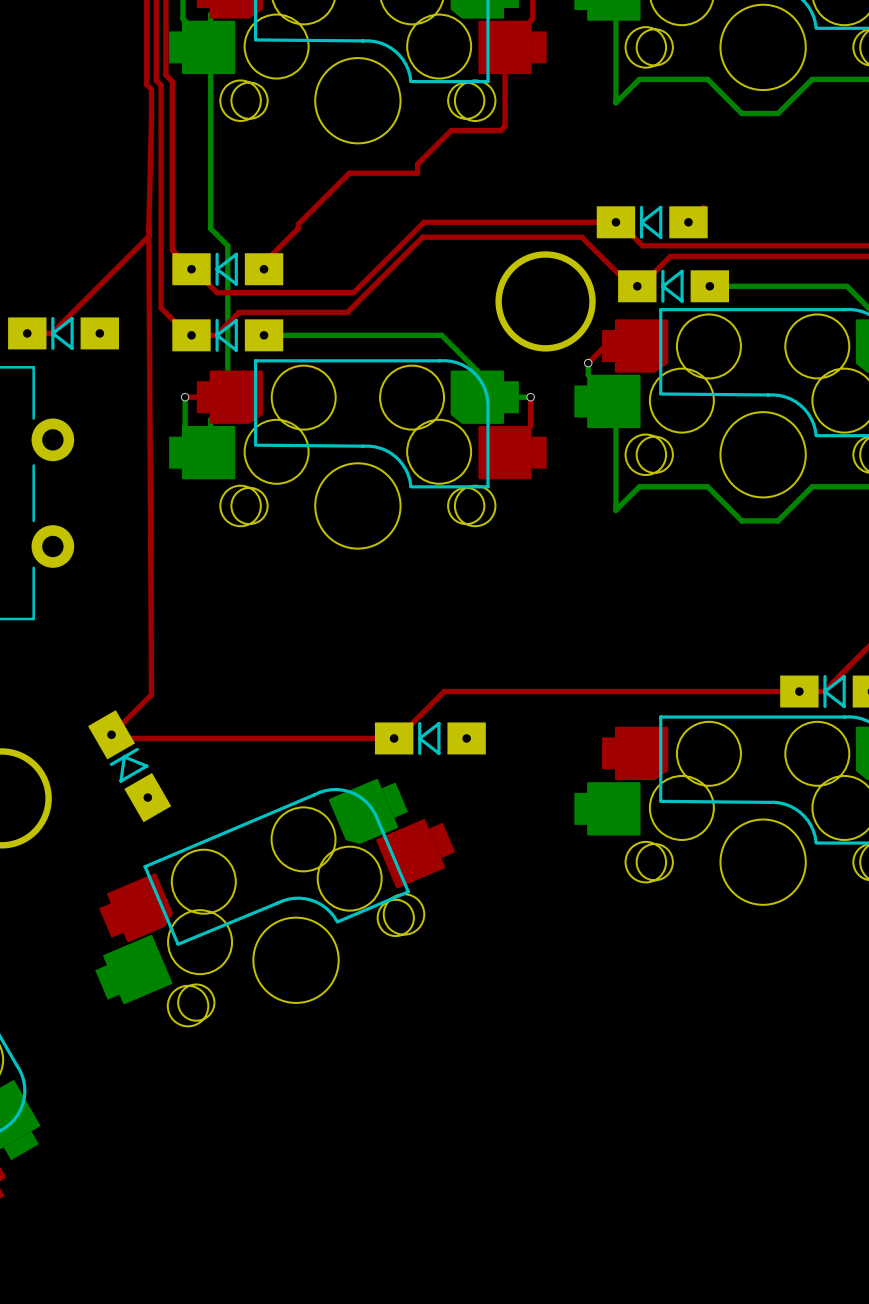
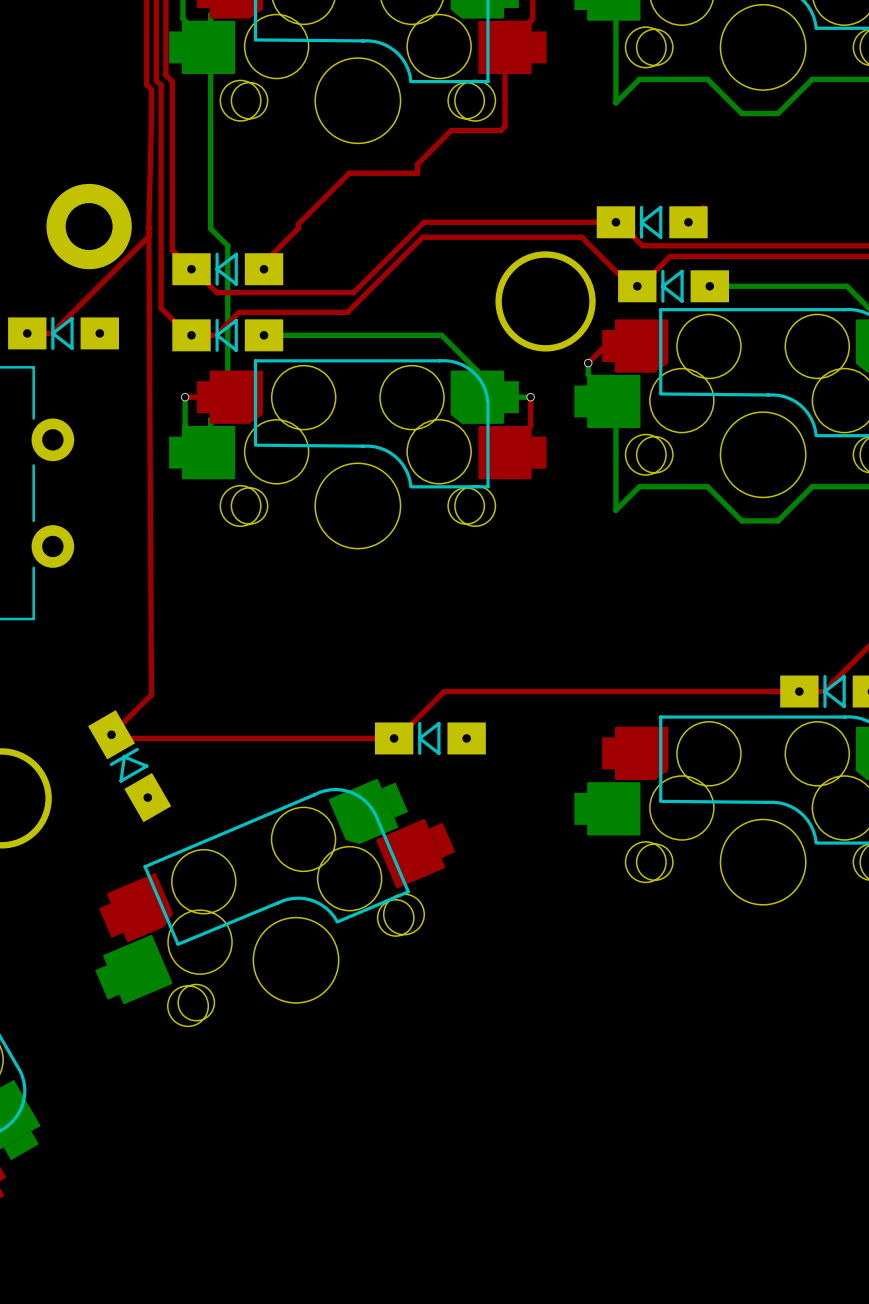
part: none -> (89, 226)

